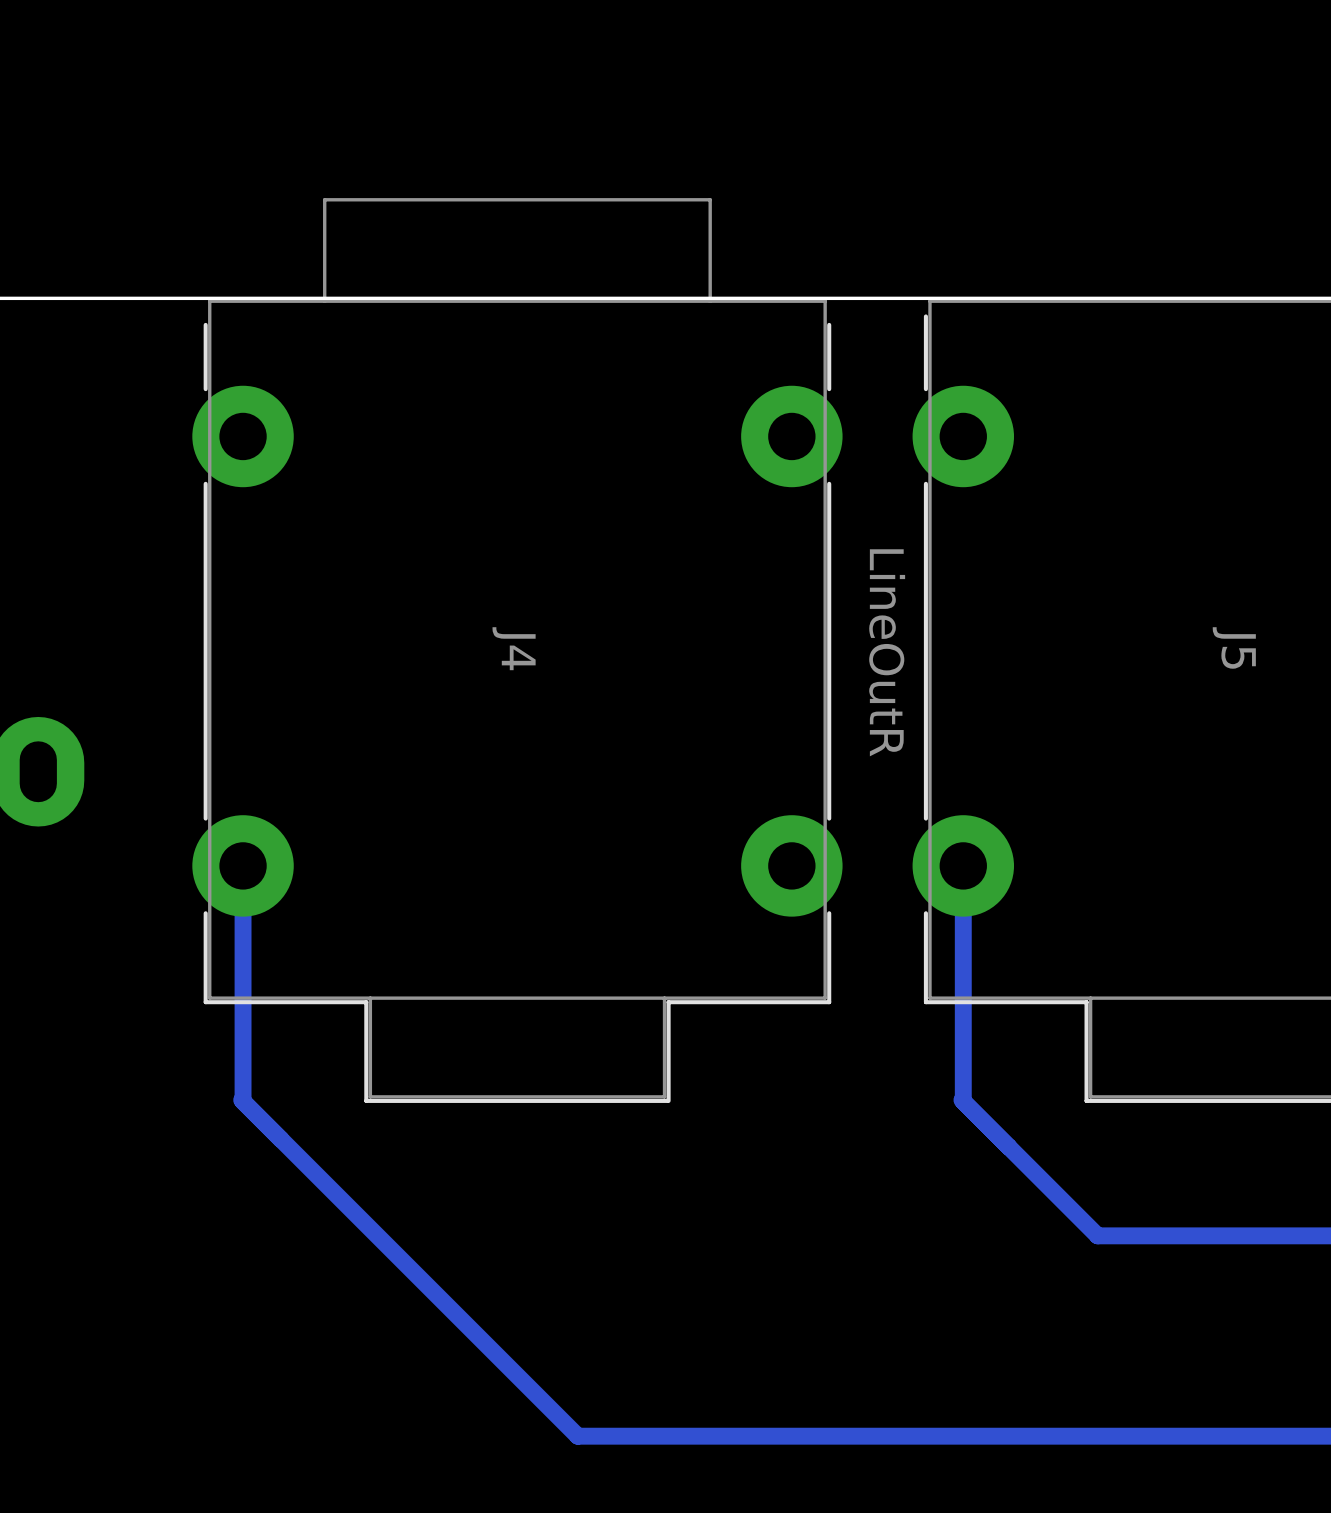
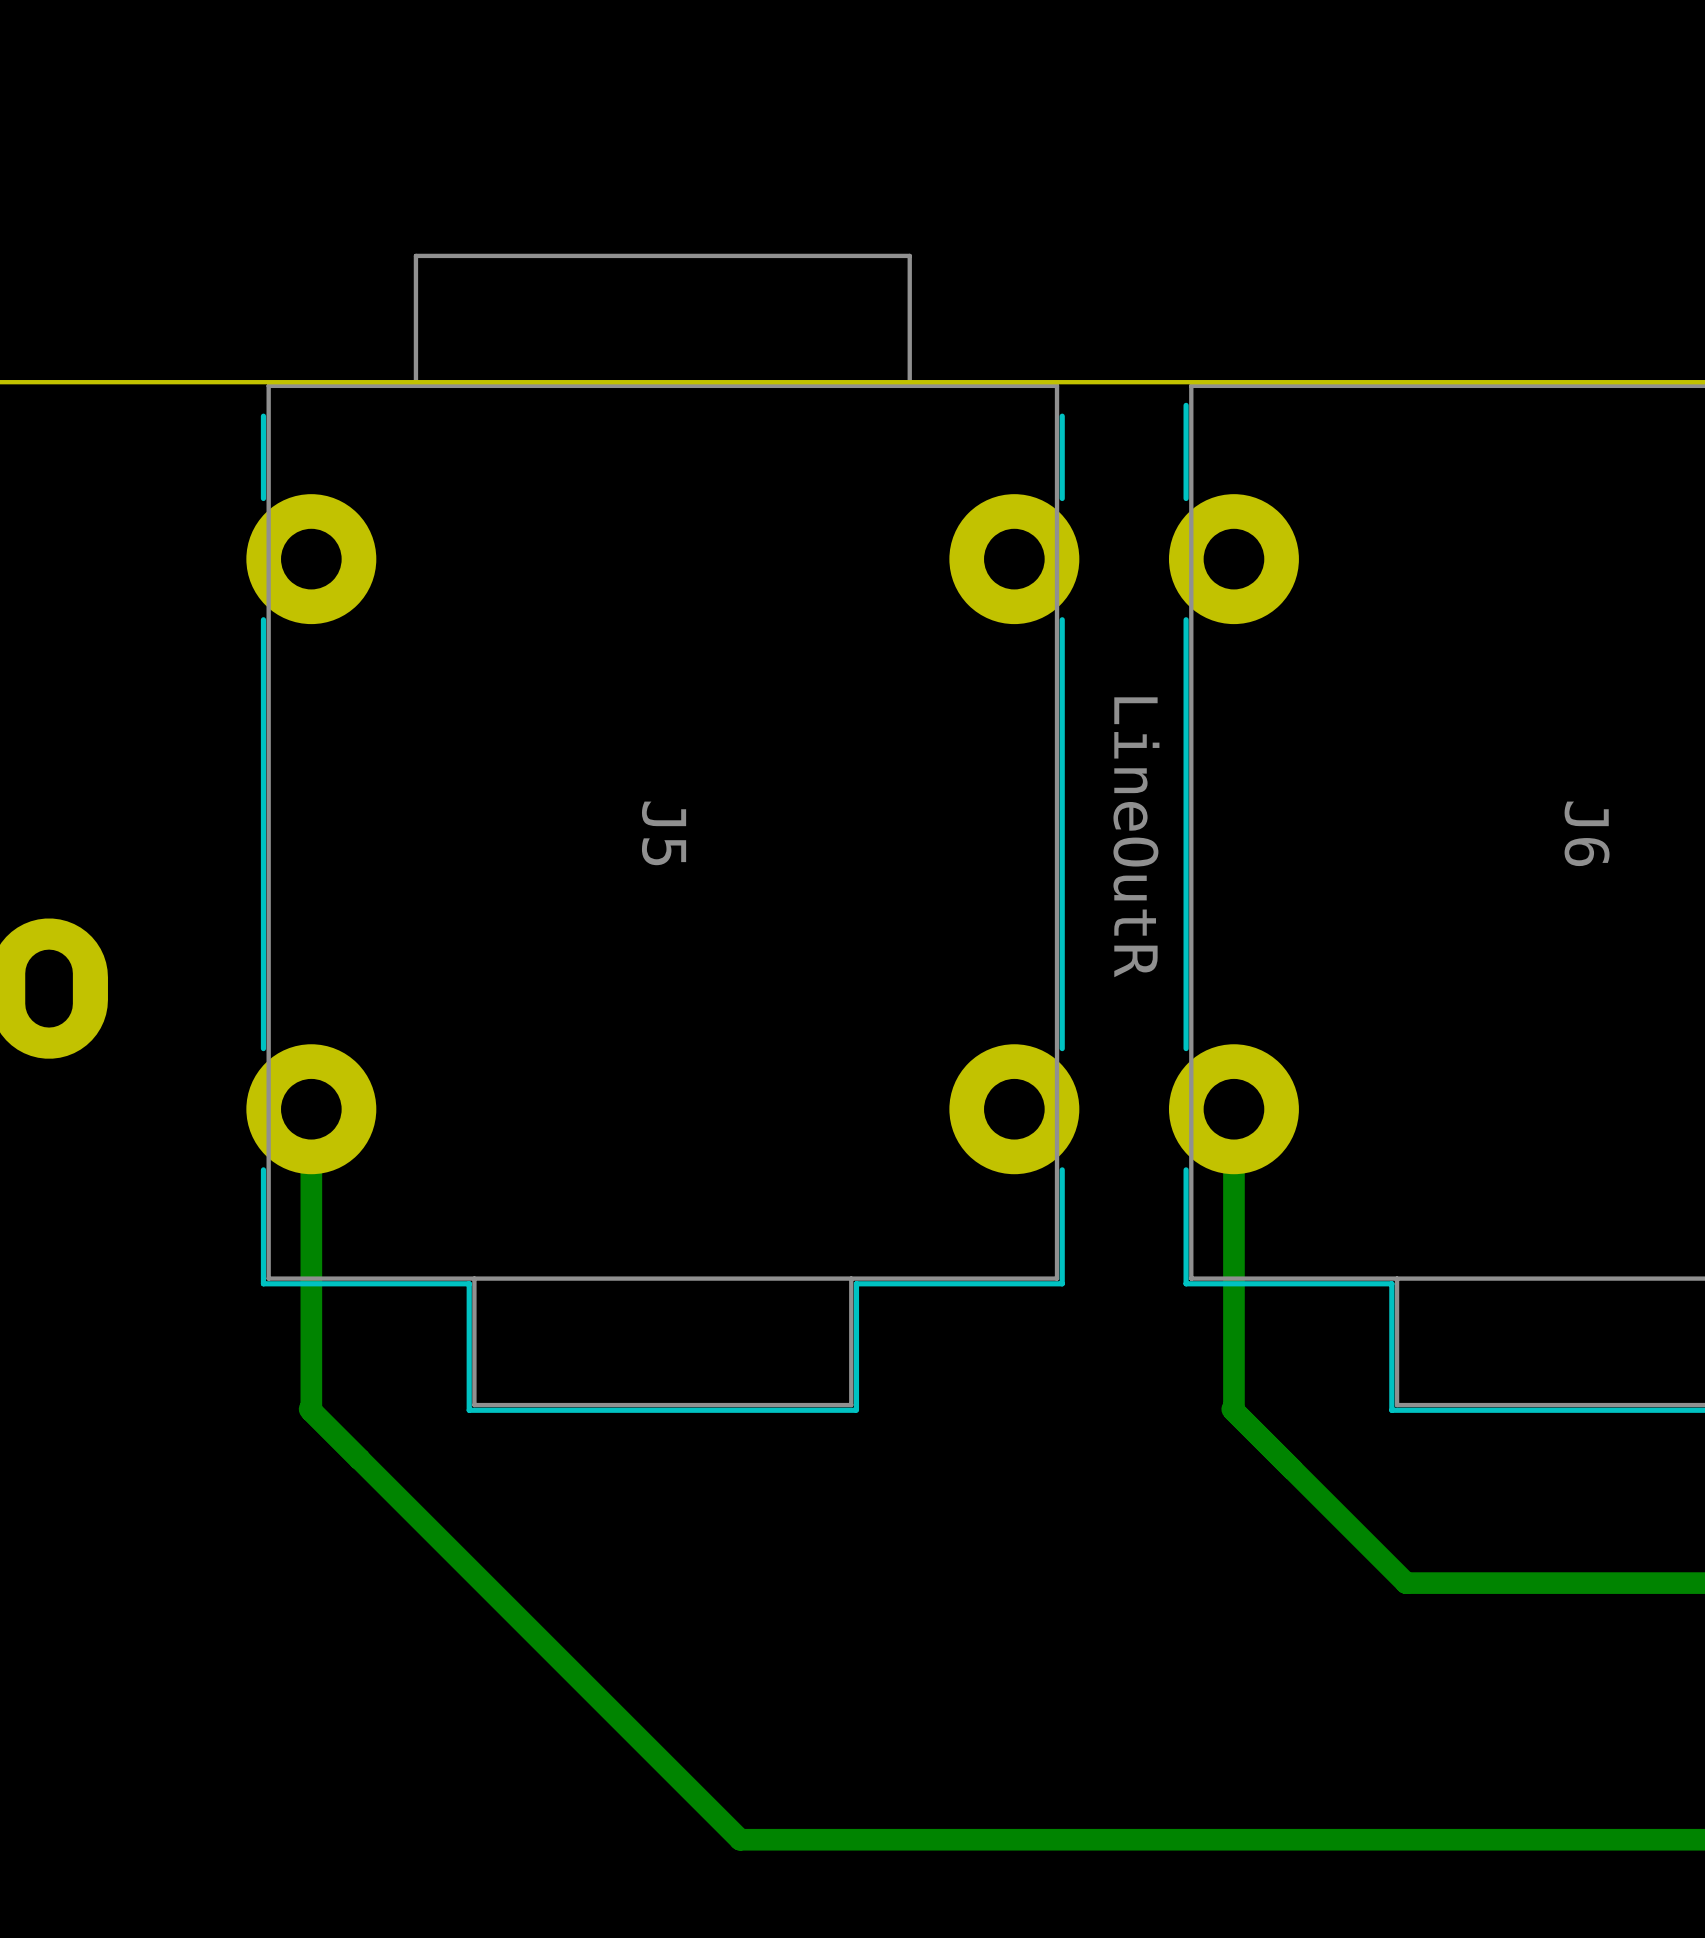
J5 name: J5 (1234, 647) -> J6 (1587, 833)
J4 name: J4 (514, 648) -> J5 (664, 833)

